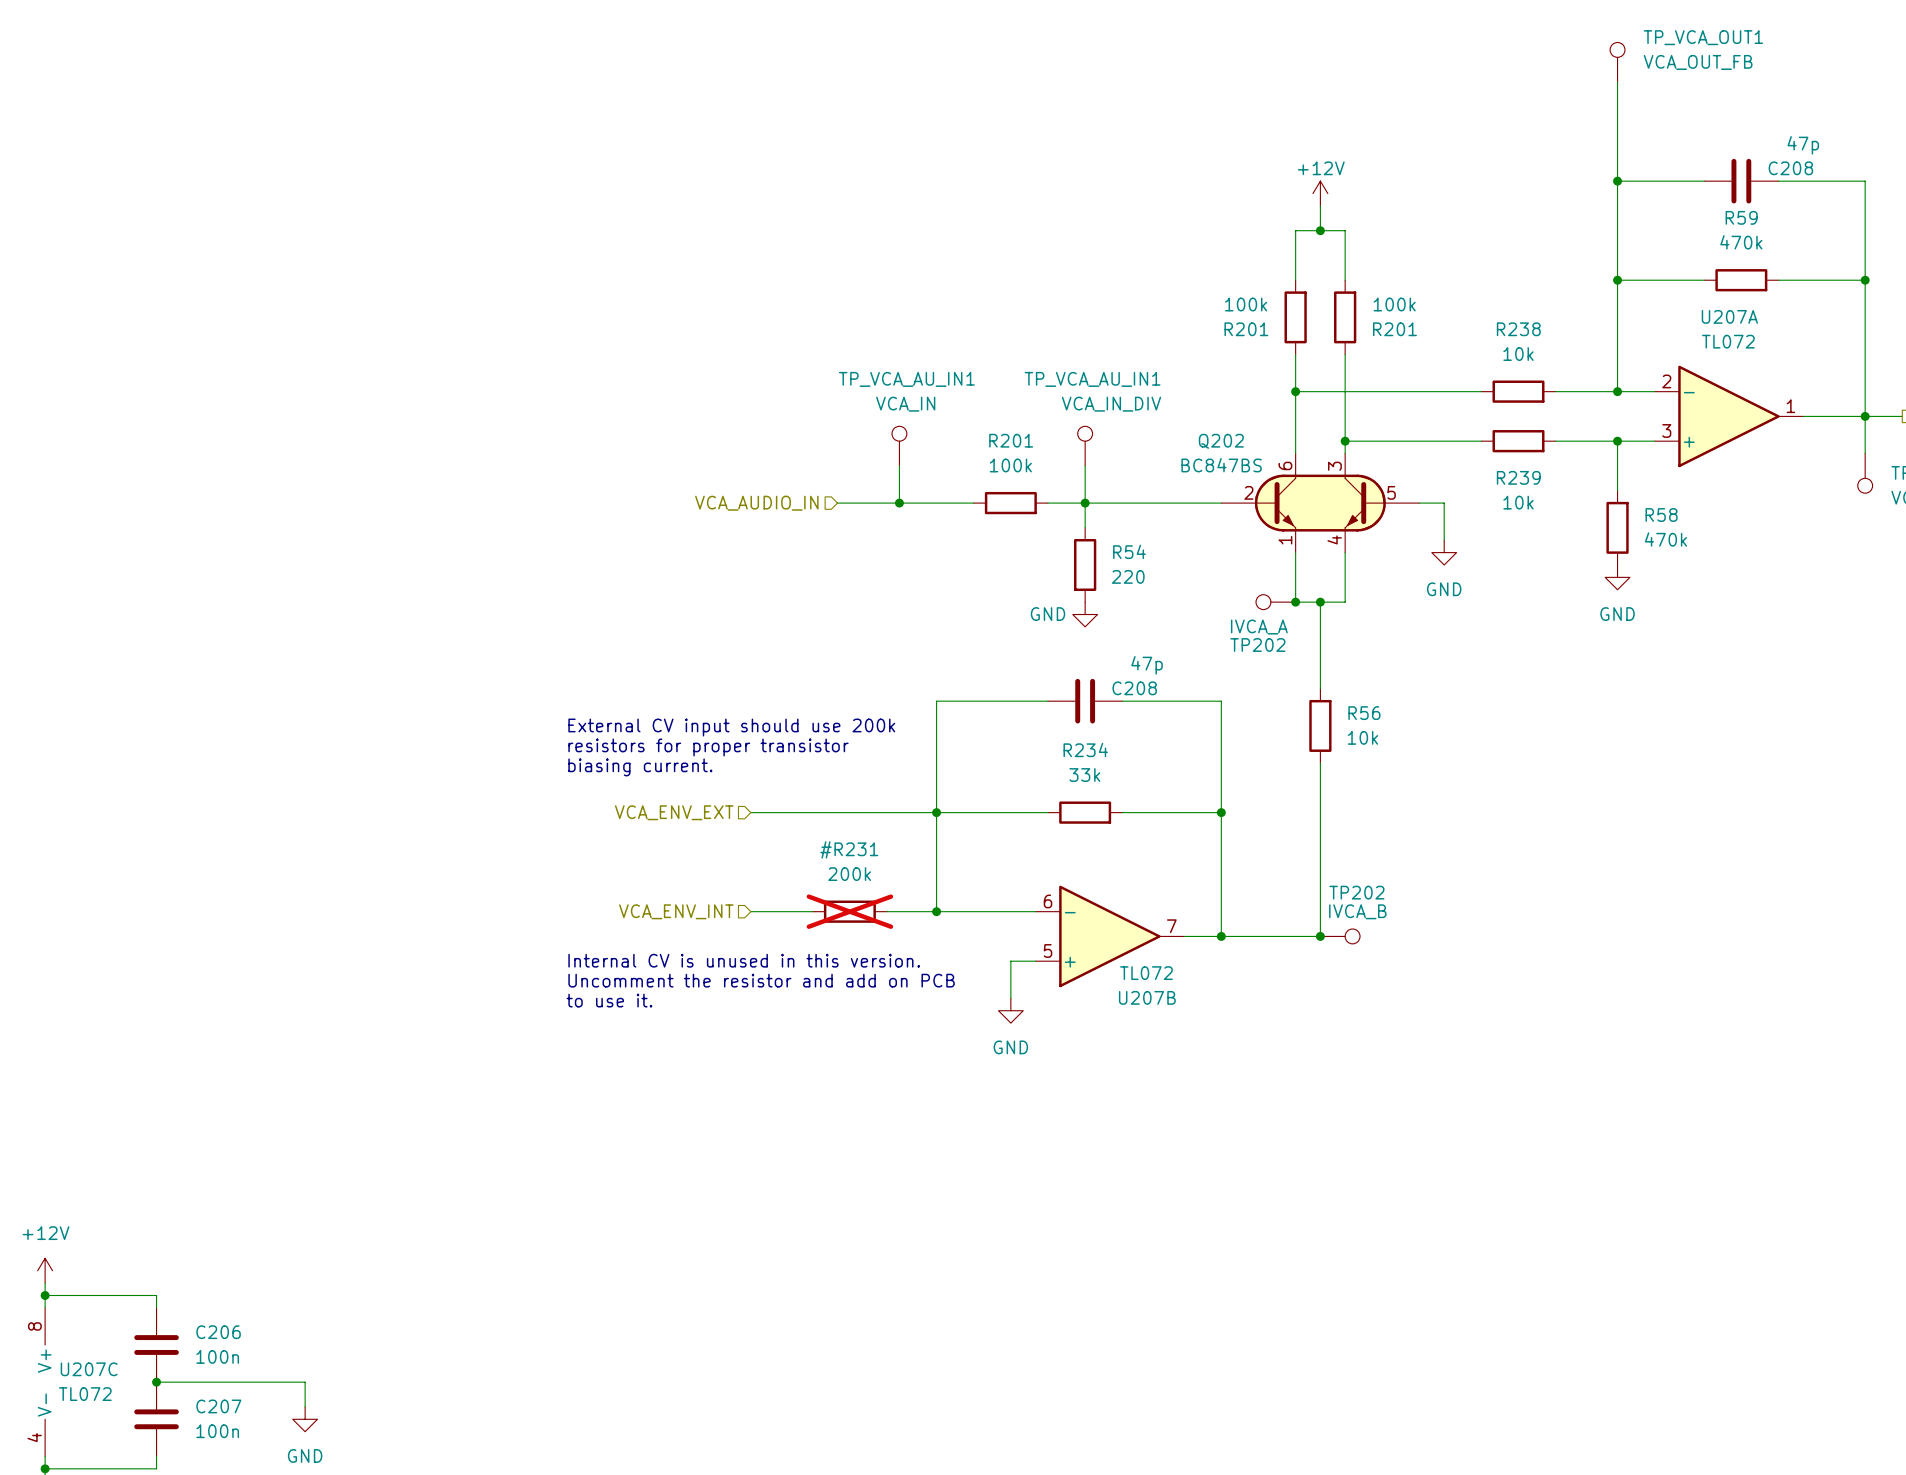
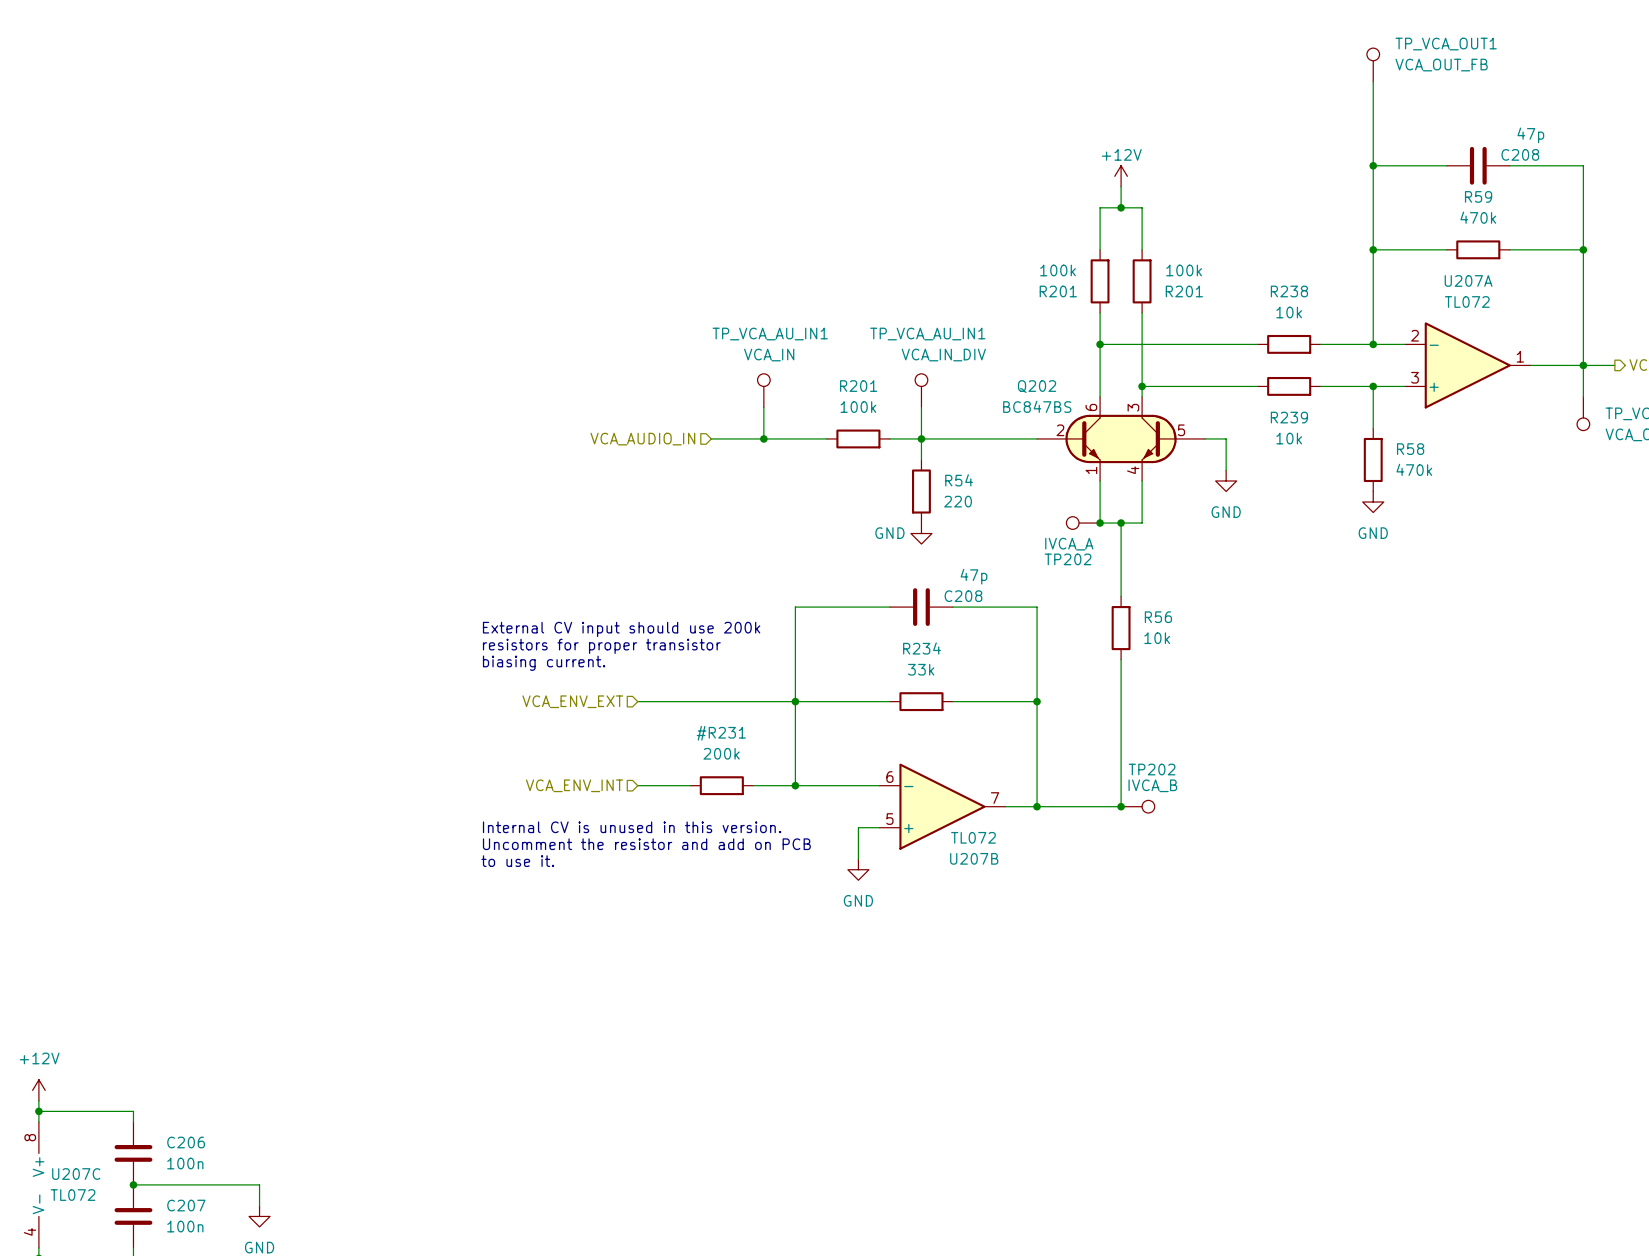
#R231 do-not-place cross: (849, 911) -> none

